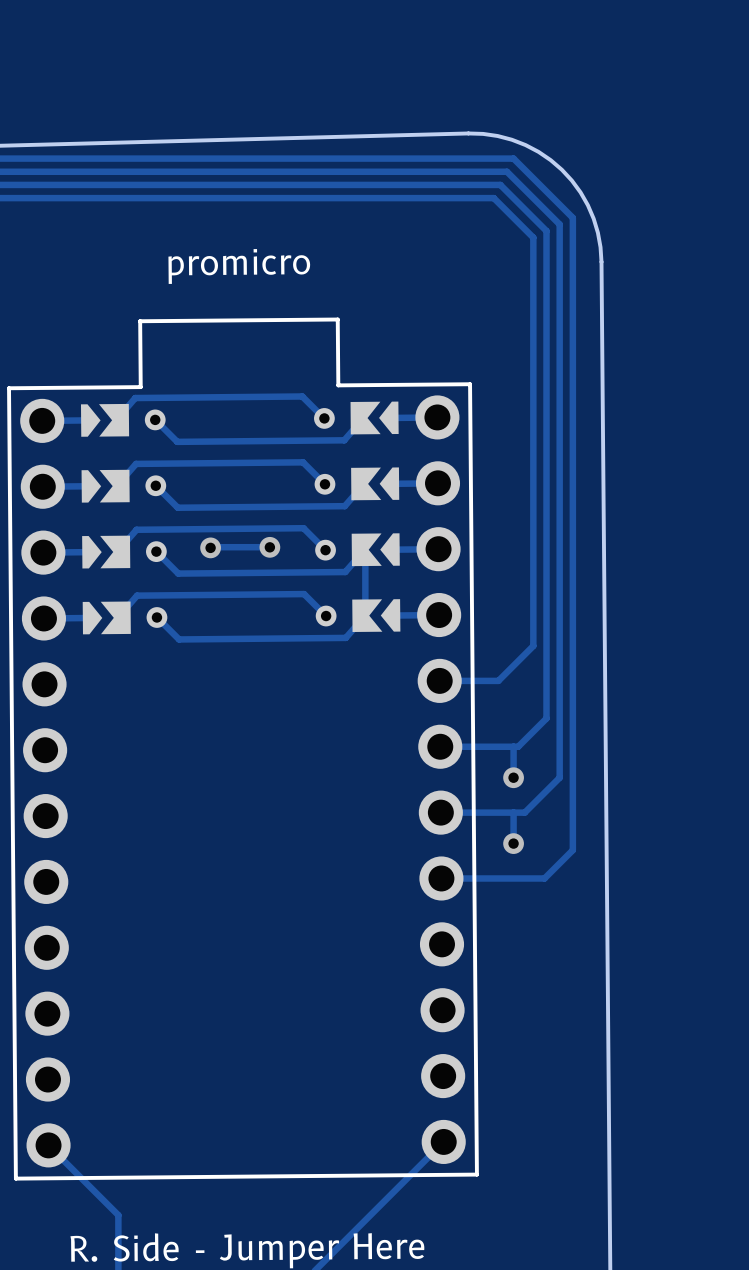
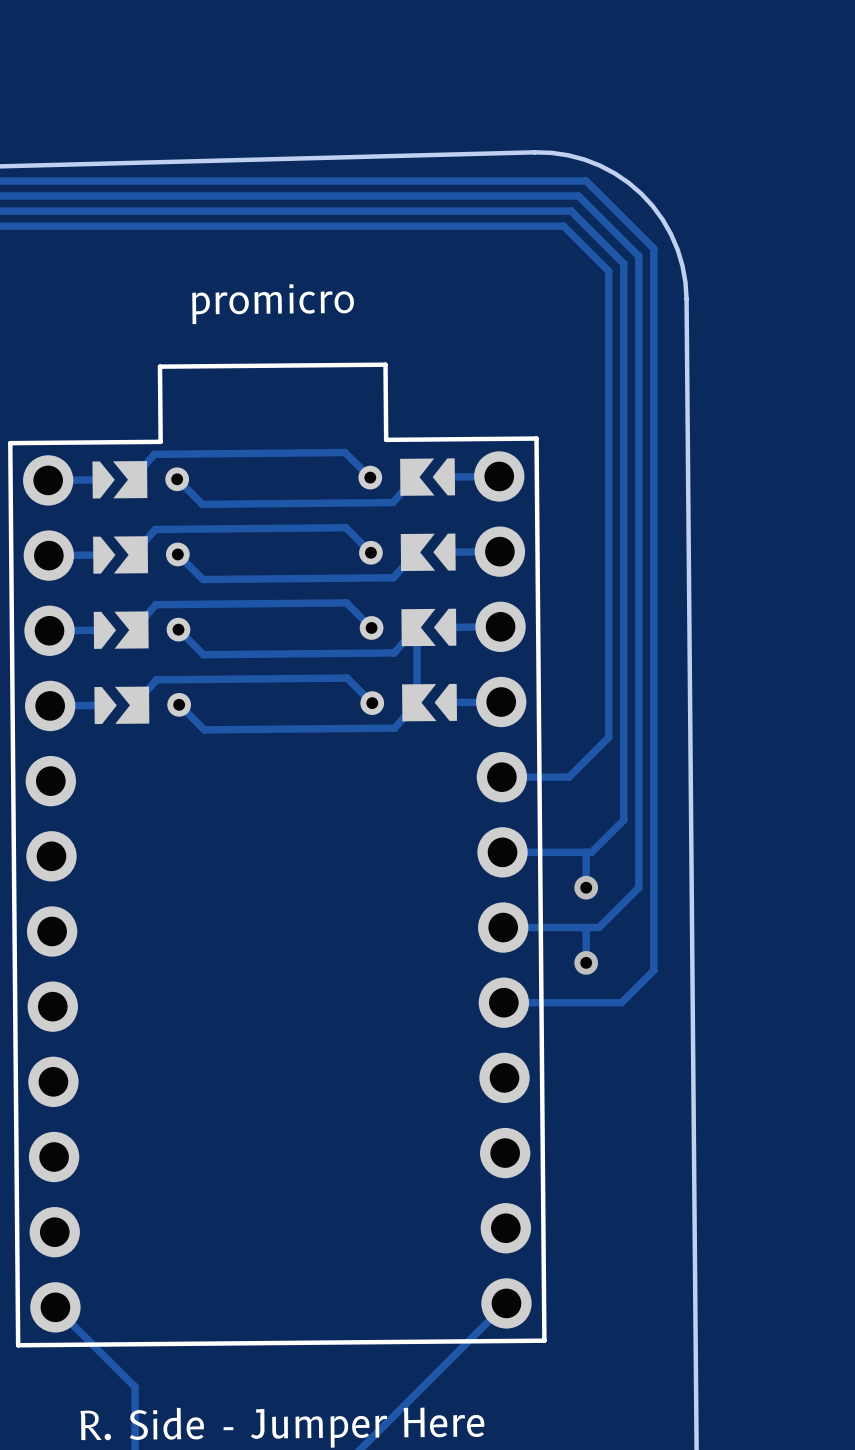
via: (210, 547) -> none
track: (269, 547) (210, 547) -> none
via: (269, 547) -> none

